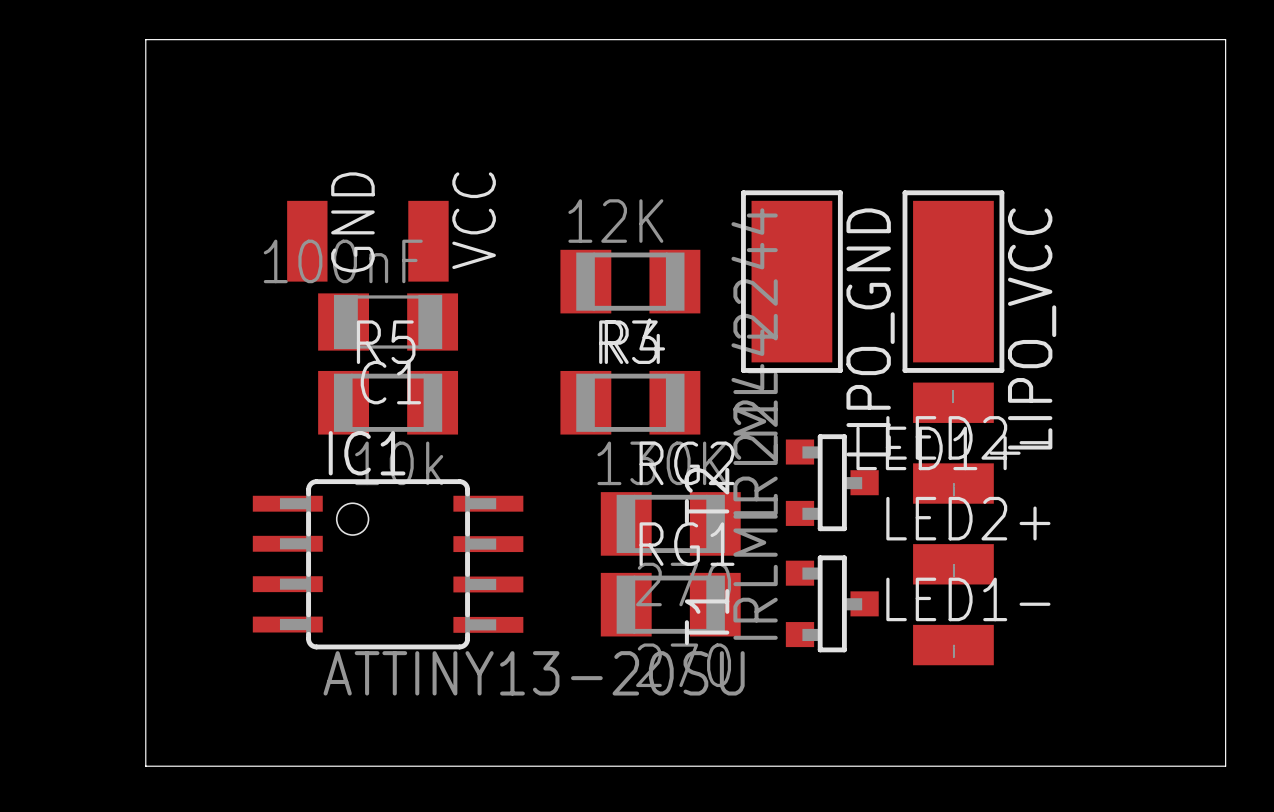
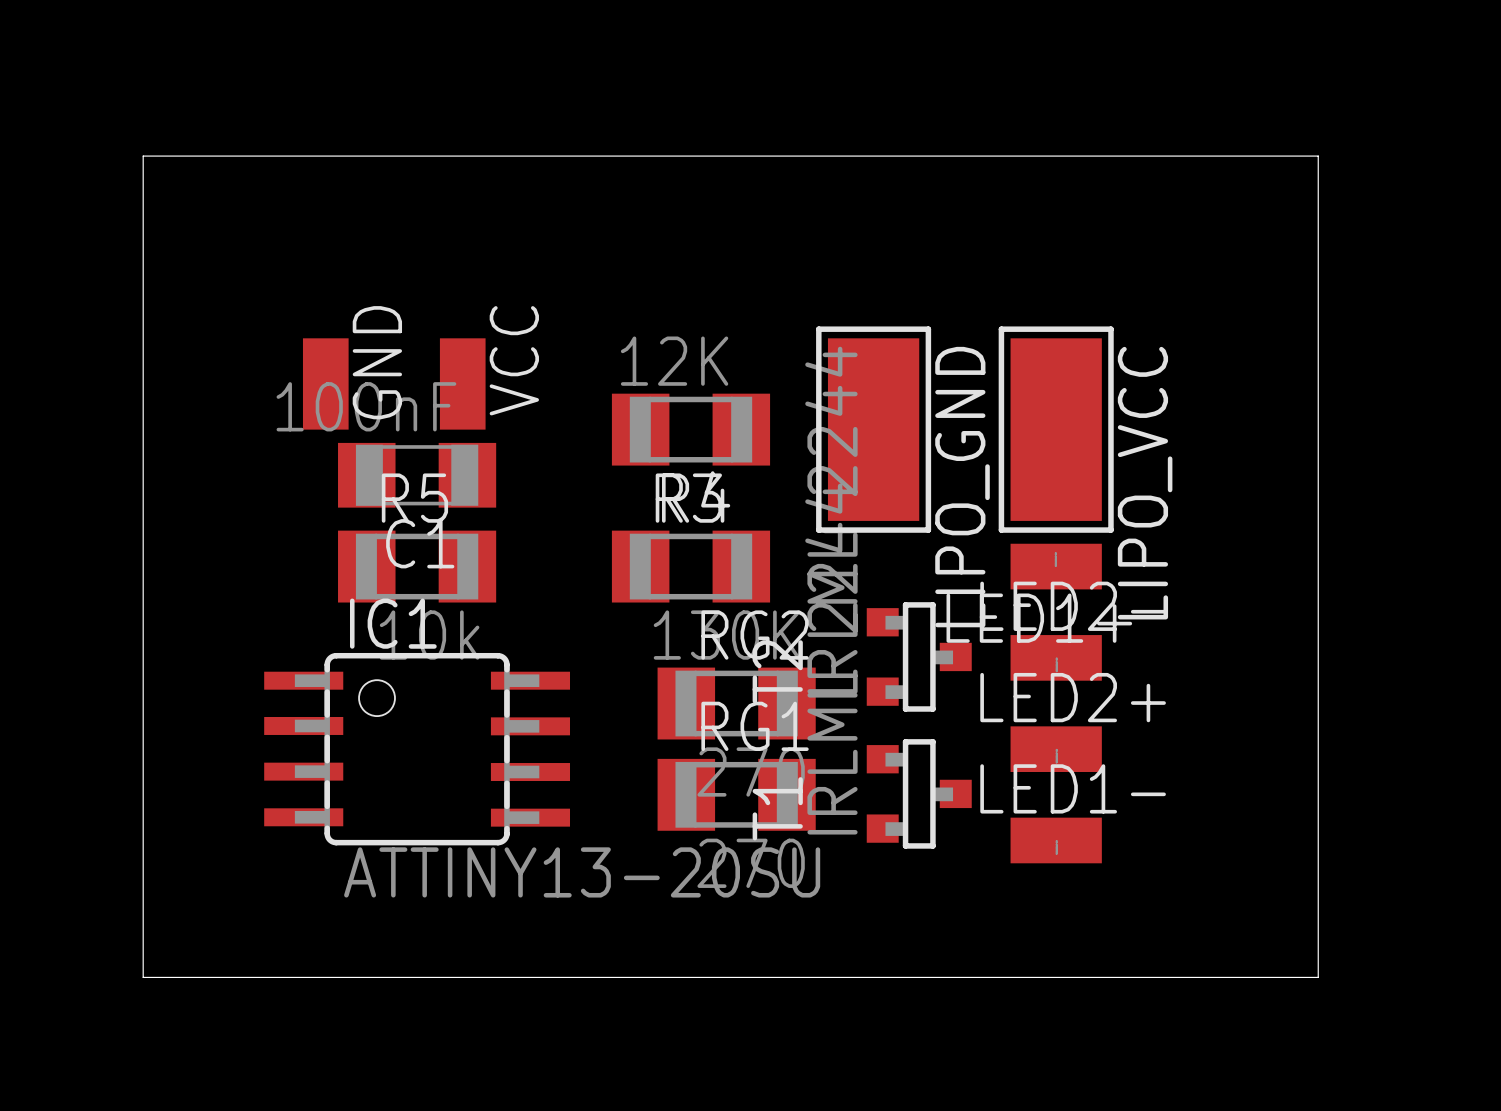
board edge: (1185, 39) (1225, 39) (1225, 766) (1185, 766) -> (1318, 156) (1318, 977)

